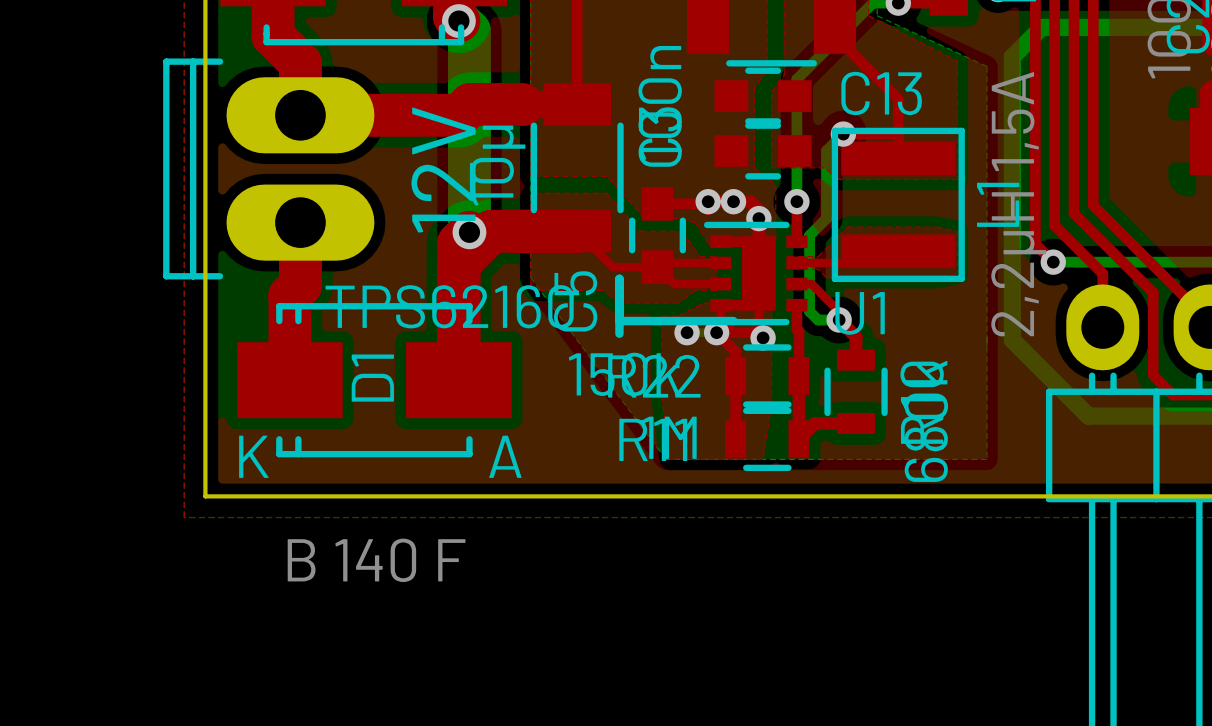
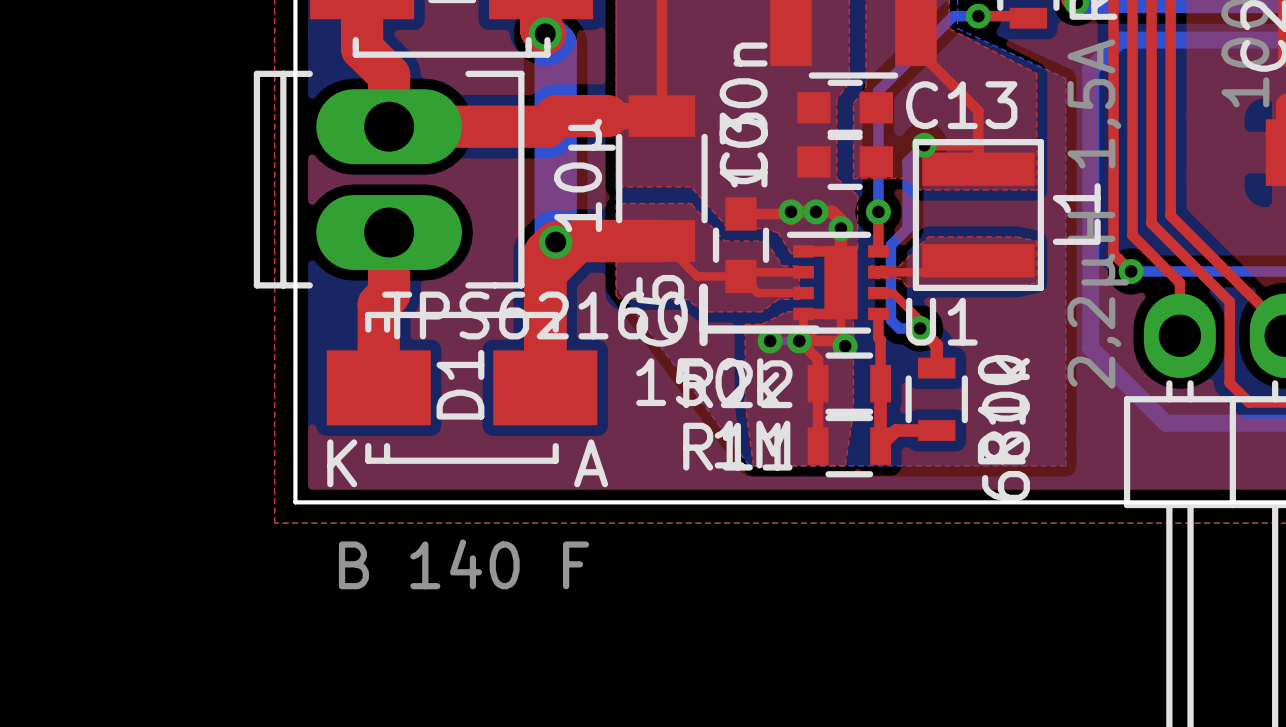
part footprint: [163, 58, 375, 280] -> [253, 70, 525, 289]
text: 12V (443, 169) -> none

